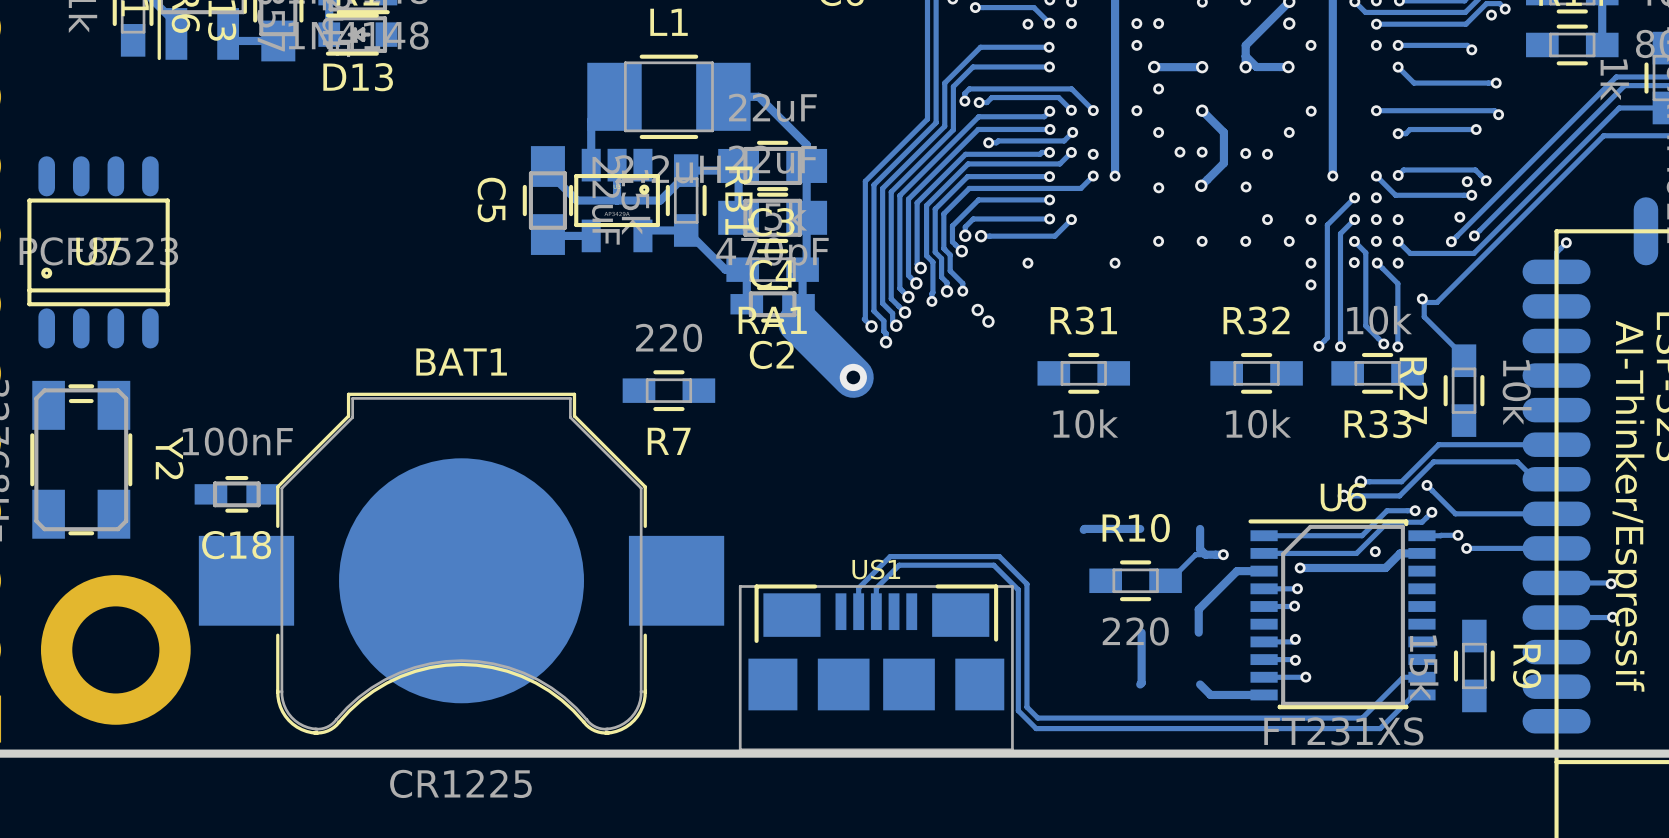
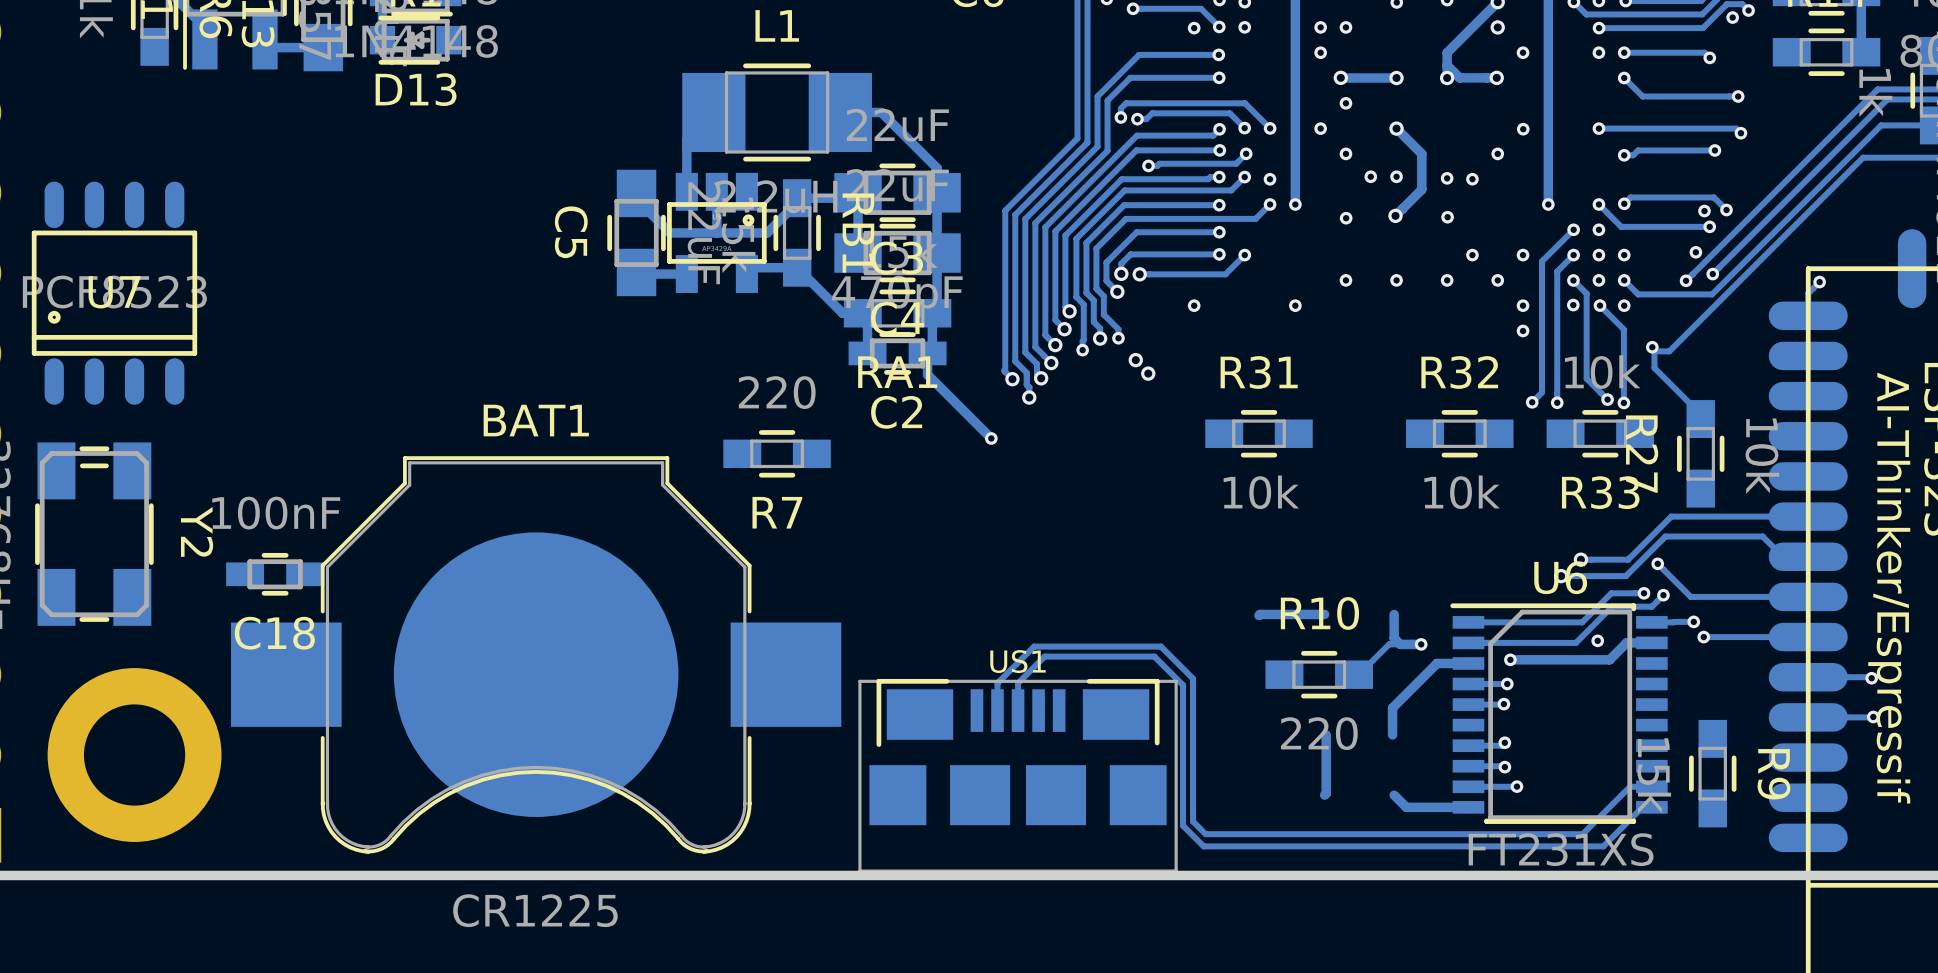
track width: thick (798, 322) (853, 377) -> thin (927, 374) (991, 438)
via size: [839, 363, 867, 392] -> [985, 432, 998, 445]

